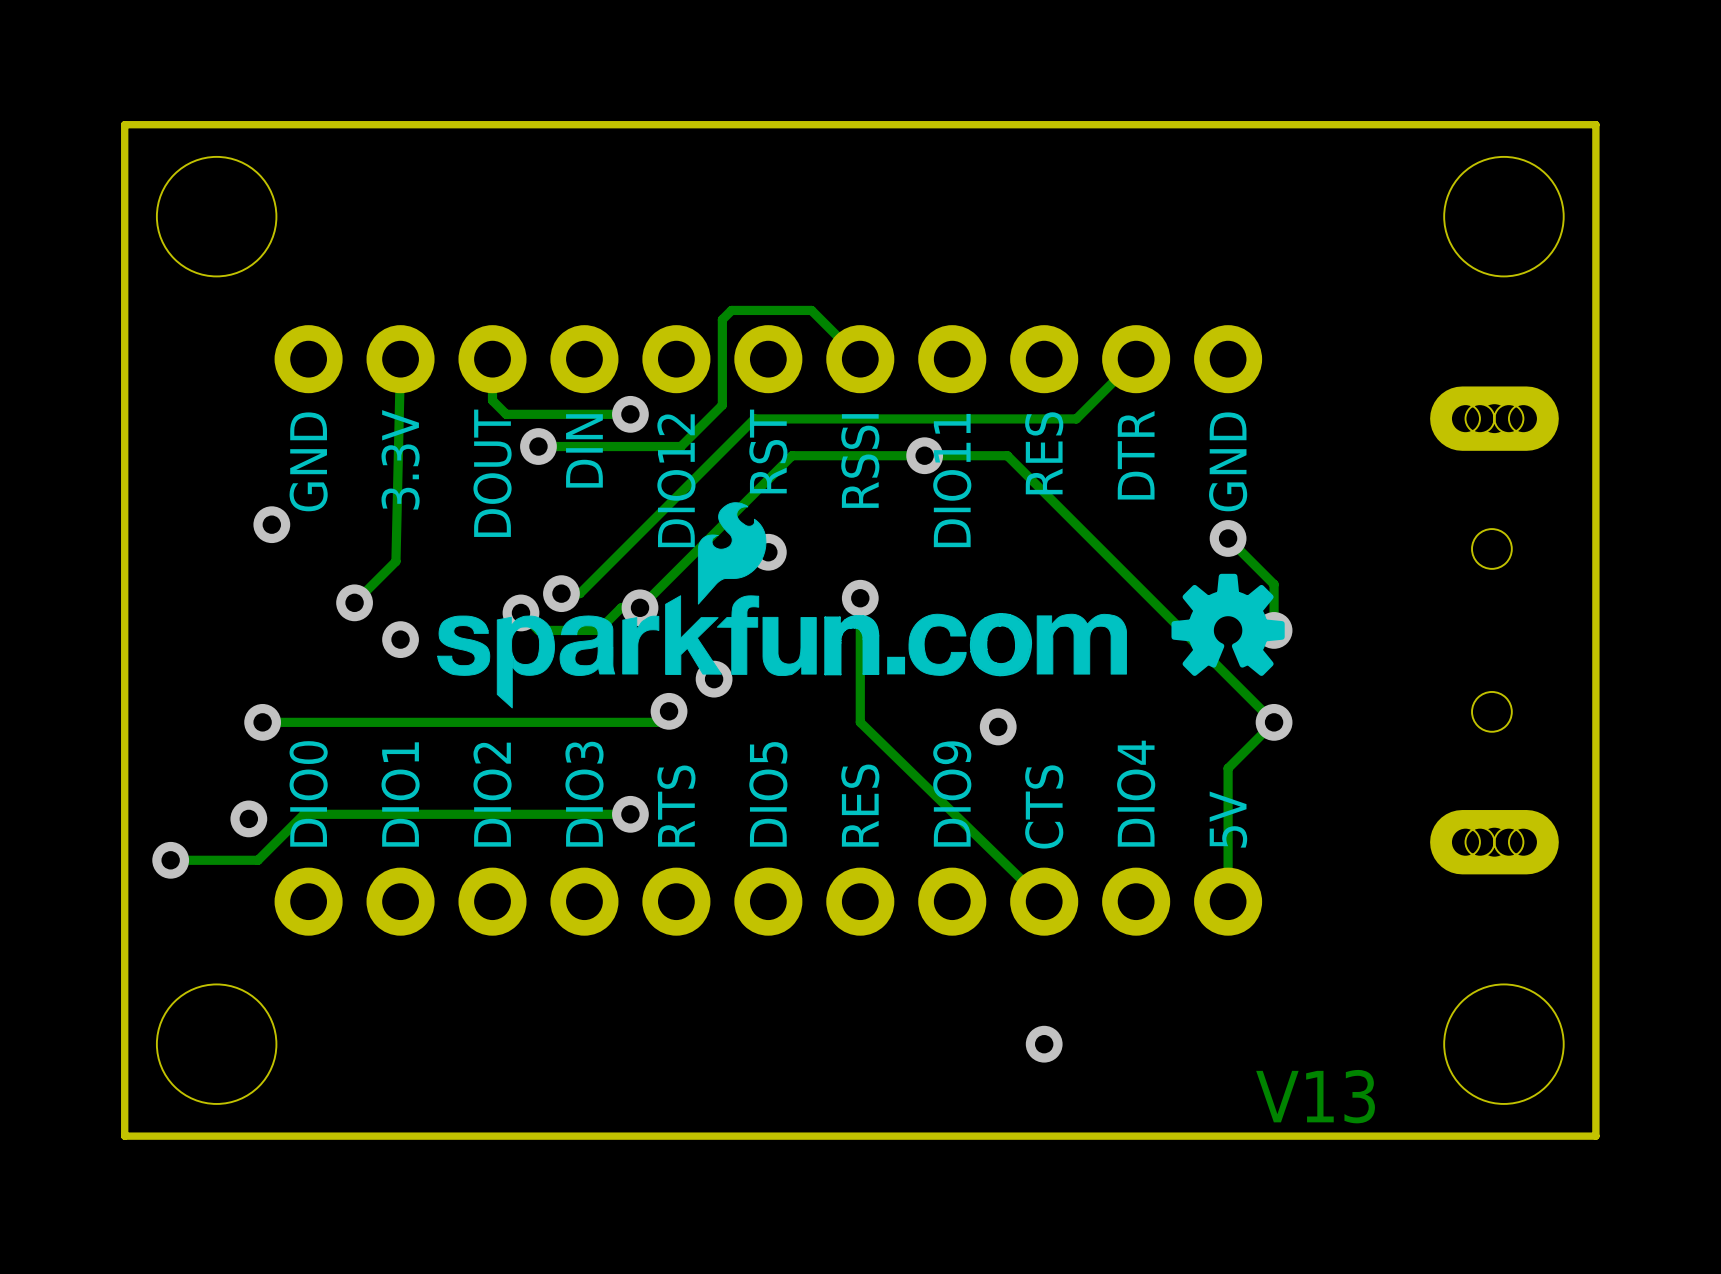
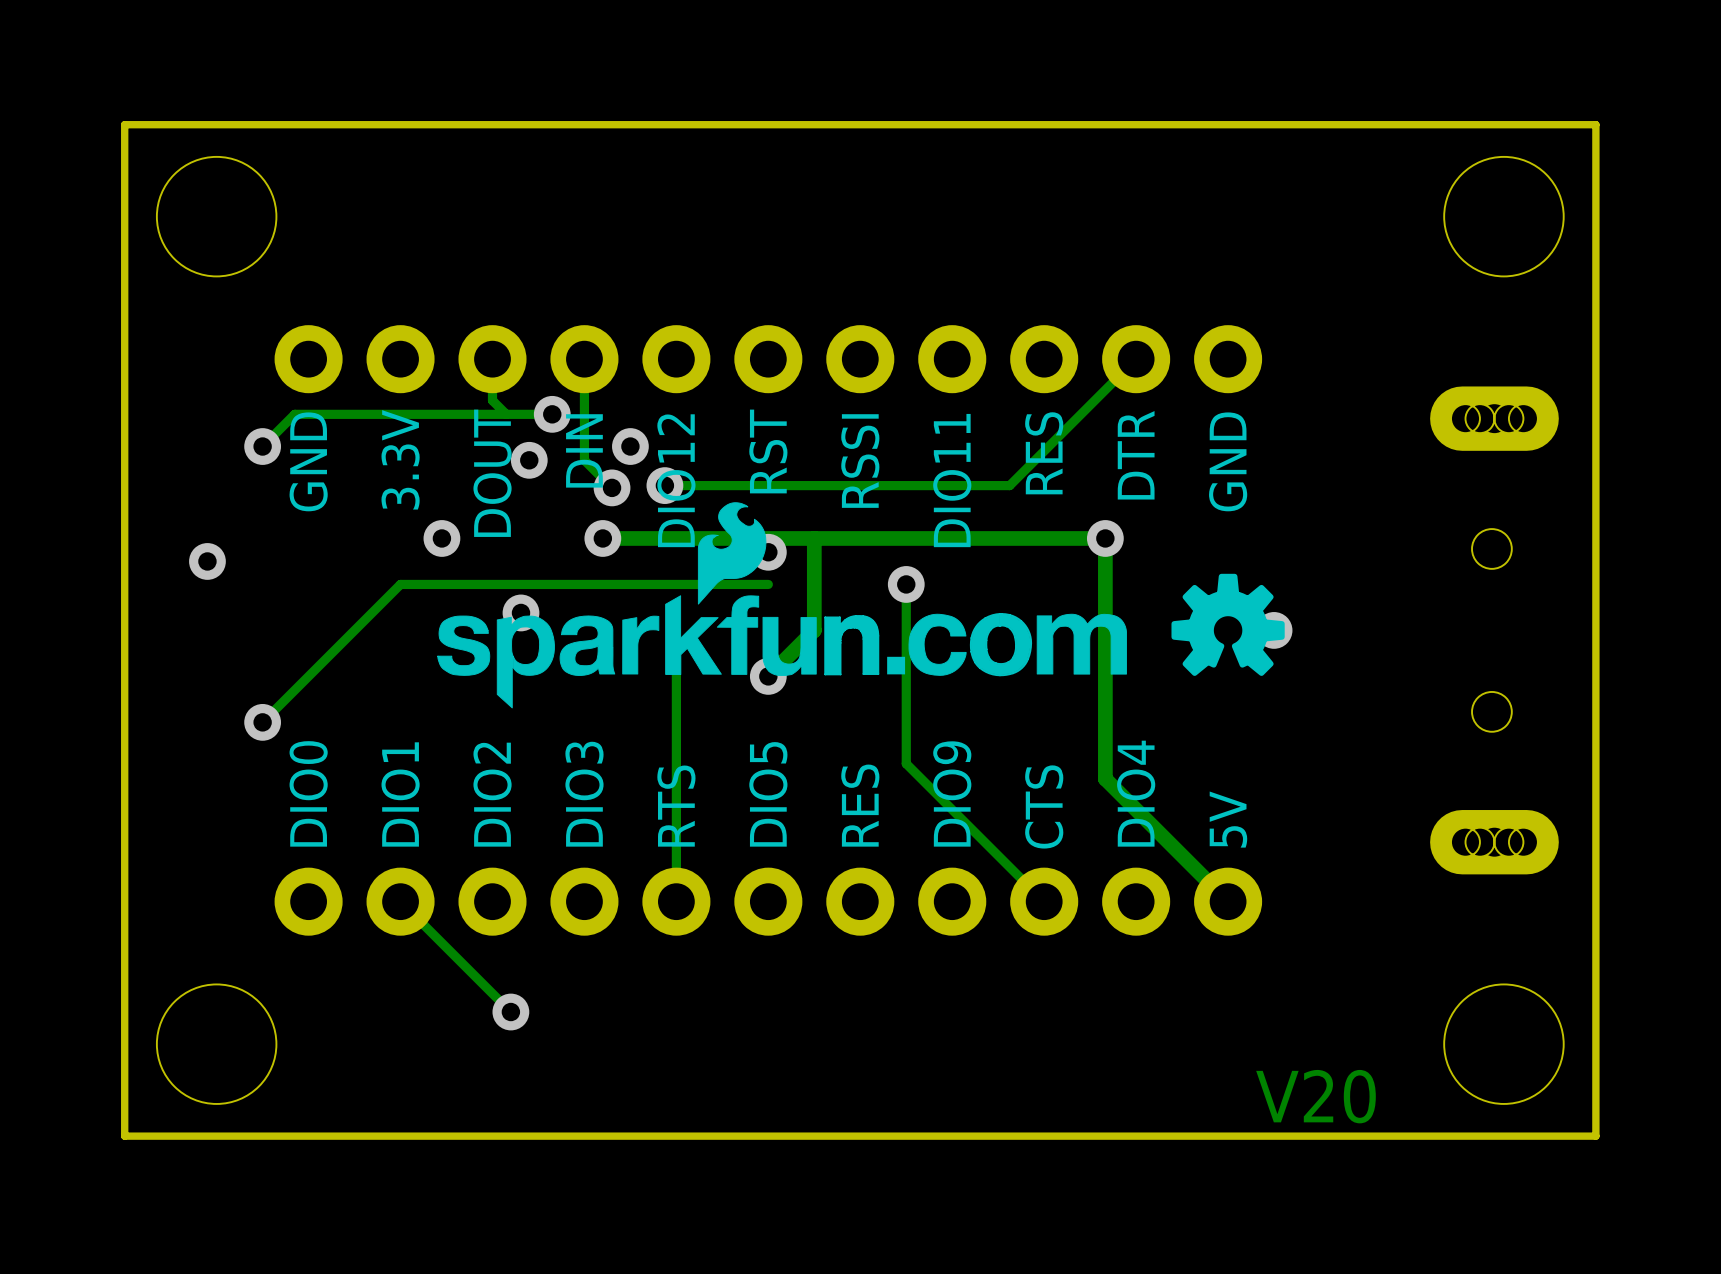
track: (400, 359) (395, 561) (354, 602) -> none
track: none -> (584, 359) (584, 460) (612, 487)
track: (860, 359) (811, 310) (731, 310) (722, 319) (722, 405) (680, 446) (538, 446) -> none
track: none -> (506, 414) (294, 414) (262, 446)
via: none -> (552, 414)
track: (630, 414) (552, 414) -> none
via position: (630, 414) -> (630, 446)
track: (1076, 418) (754, 418) (579, 593) (561, 593) -> (1076, 418) (1009, 485) (664, 485)
via: none -> (262, 446)
via position: (538, 446) -> (529, 460)
via: (924, 455) -> none
via: none -> (664, 485)
via: none -> (612, 487)
via: (271, 524) -> none
via: none -> (441, 538)
via: none -> (602, 538)
track: none -> (814, 538) (814, 630) (768, 676)
via: none -> (1105, 538)
track: (1228, 538) (1274, 584) (1274, 630) -> none
via: (1228, 538) -> none
via: none -> (207, 561)
via: (561, 593) -> none
track: (860, 598) (860, 722) (1044, 901) -> (906, 584) (906, 763) (1044, 901)
via position: (860, 598) -> (906, 584)
via: (354, 602) -> none
via: (640, 607) -> none
track: (521, 612) (538, 630) (598, 630) (621, 607) (640, 607) (792, 455) (1007, 455) (1274, 722) (1228, 768) (1228, 901) -> (602, 538) (1105, 538) (1105, 778) (1228, 901)
track: none -> (676, 630) (676, 901)
via: (400, 639) -> none
via: none -> (768, 676)
via: (714, 679) -> none
track: (669, 711) (658, 722) (262, 722) -> (768, 584) (400, 584) (262, 722)
via: (669, 711) -> none
via: (1274, 722) -> none
via: (998, 726) -> none
track: (630, 814) (304, 814) (258, 860) (170, 860) -> none
via: (630, 814) -> none
via: (248, 818) -> none
via: (170, 860) -> none
track: none -> (400, 901) (510, 1012)
via: none -> (510, 1012)
via: (1044, 1044) -> none
text: V13 (1315, 1096) -> V20 (1316, 1096)

